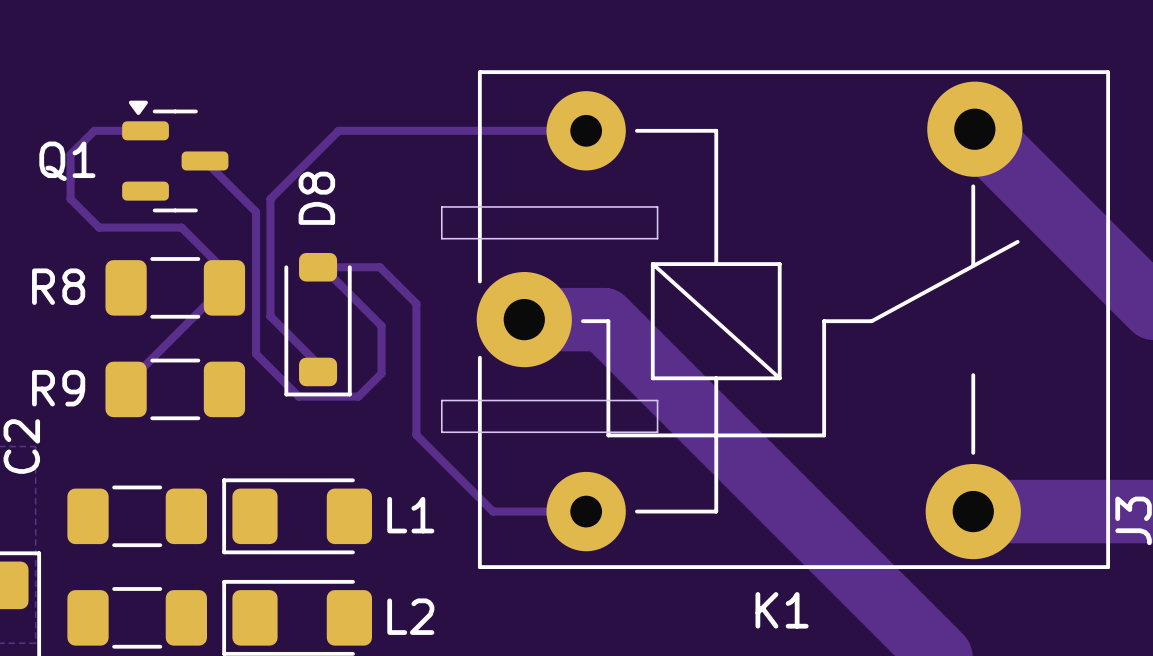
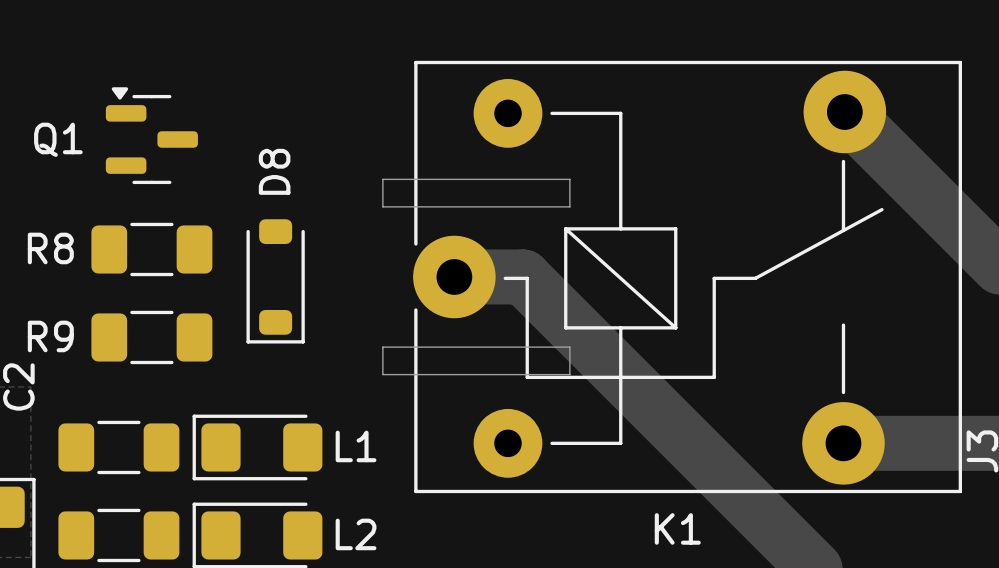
track: (145, 130) (94, 130) (70, 154) (70, 199) (99, 227) (181, 227) (224, 270) (224, 287) (126, 384) (126, 389) -> none
track: (586, 130) (338, 130) (270, 199) (270, 316) (318, 364) (318, 371) -> none
track: (205, 160) (256, 212) (256, 353) (298, 396) (358, 396) (381, 373) (381, 325) (322, 267) -> none
track: (318, 267) (379, 267) (416, 303) (416, 435) (492, 511) (586, 511) -> none

